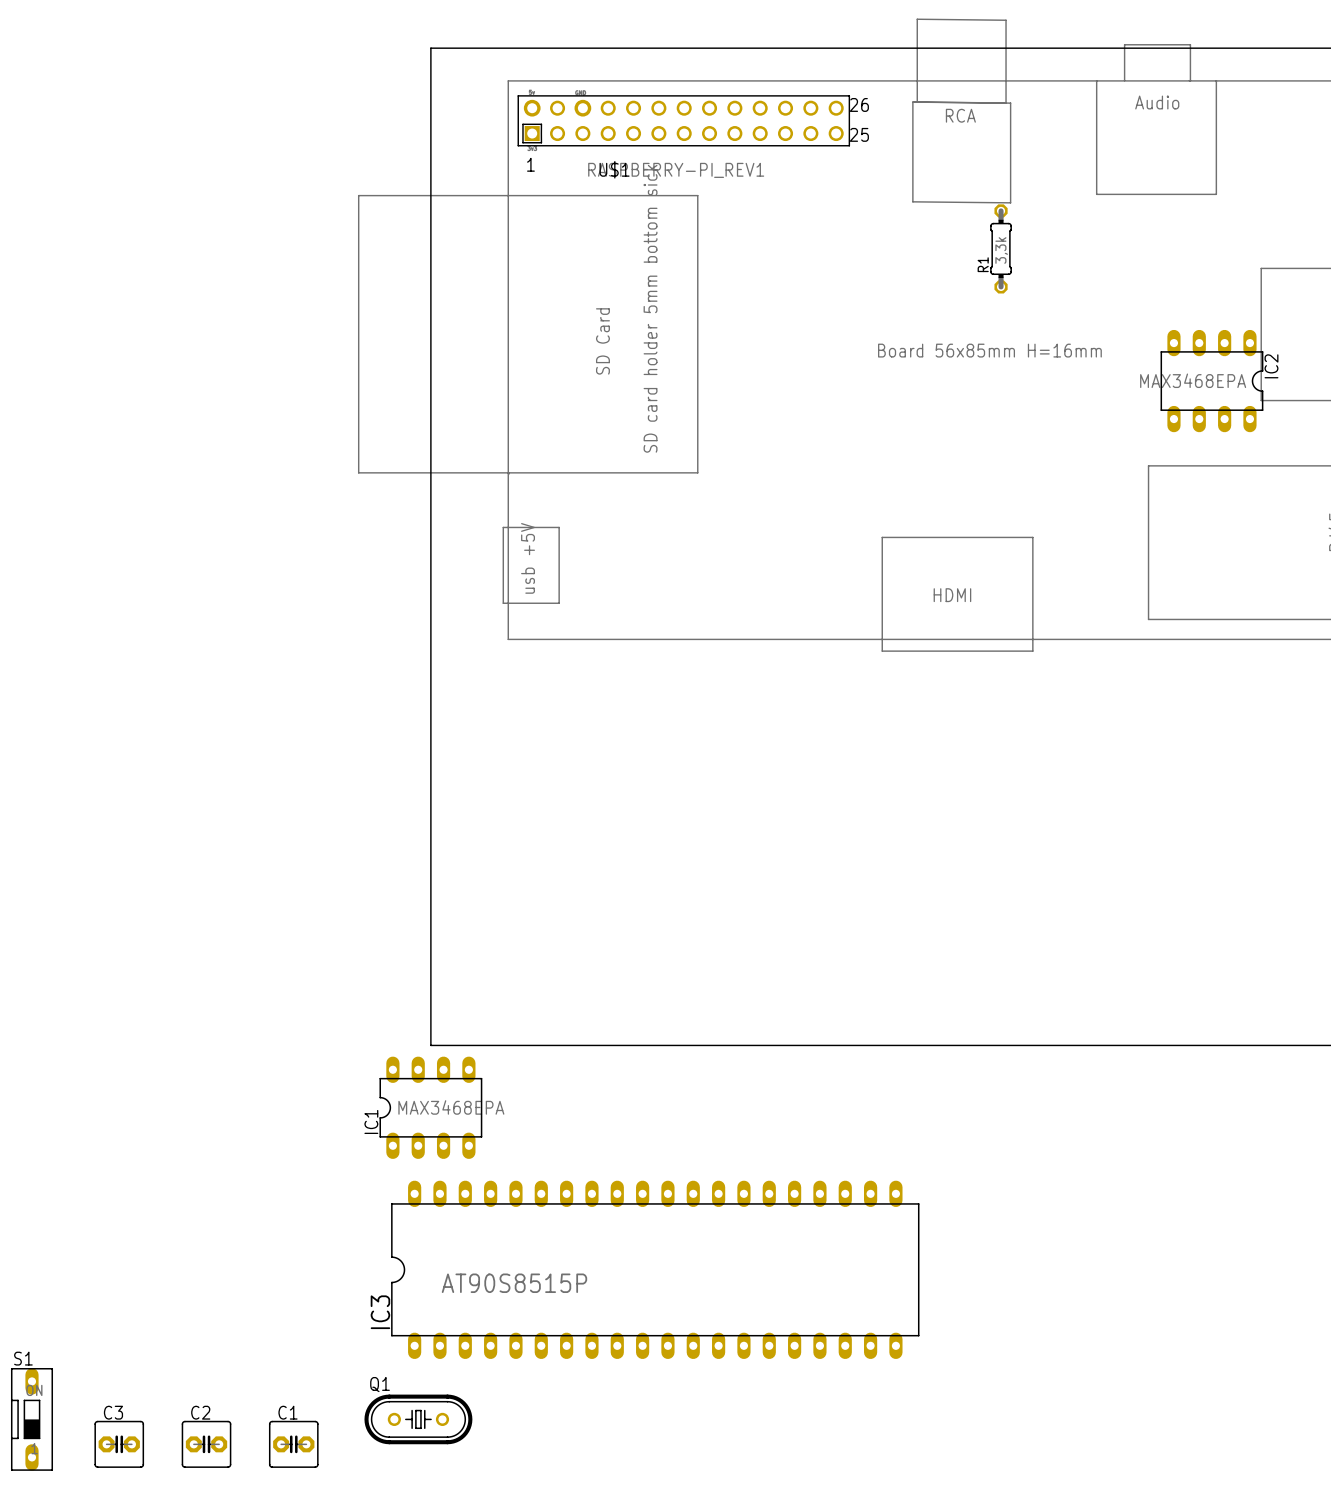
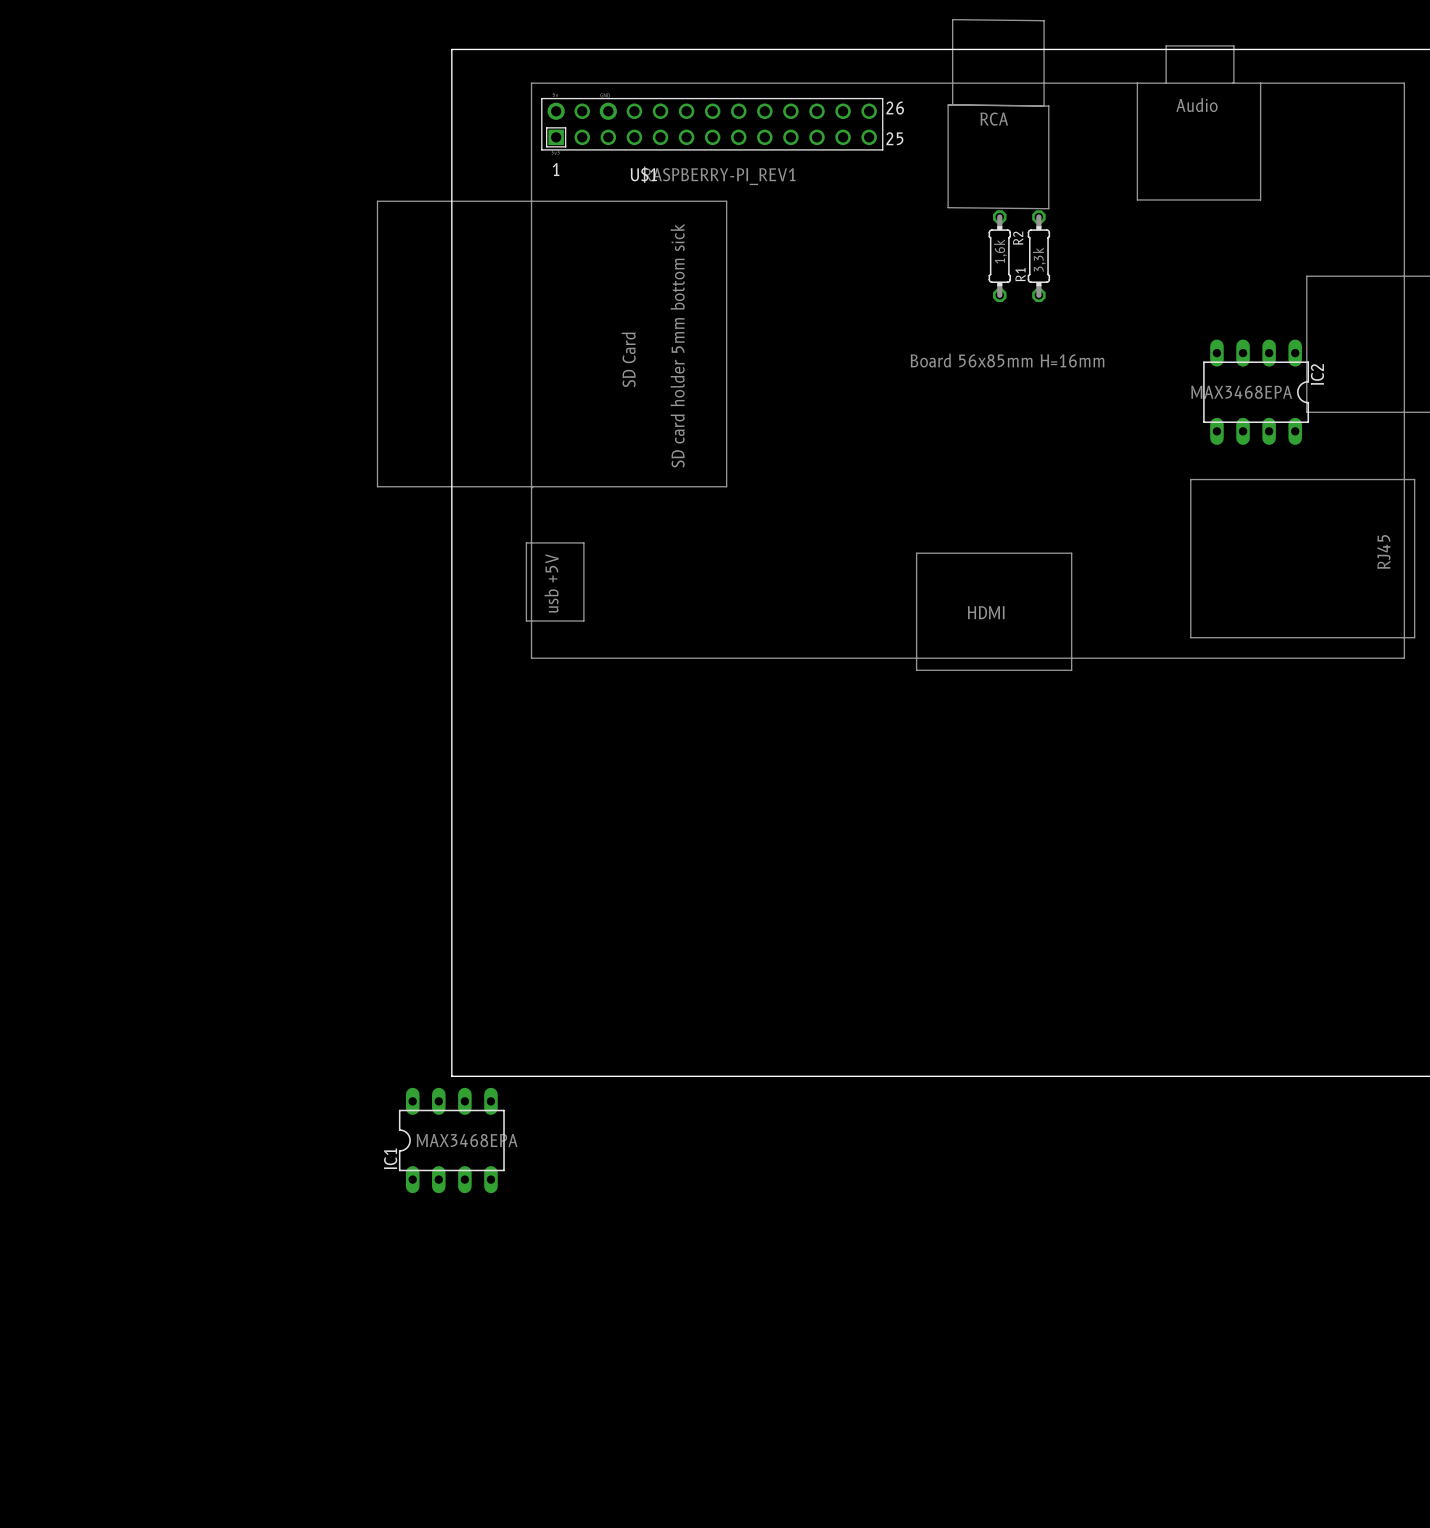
R2: none -> 1,6k (999, 256)
IC3: AT90S8515P (655, 1269) -> none
S1: (31, 1419) -> none
Q1: (418, 1419) -> none
C3: (119, 1444) -> none
C2: (206, 1444) -> none
C1: (293, 1444) -> none

